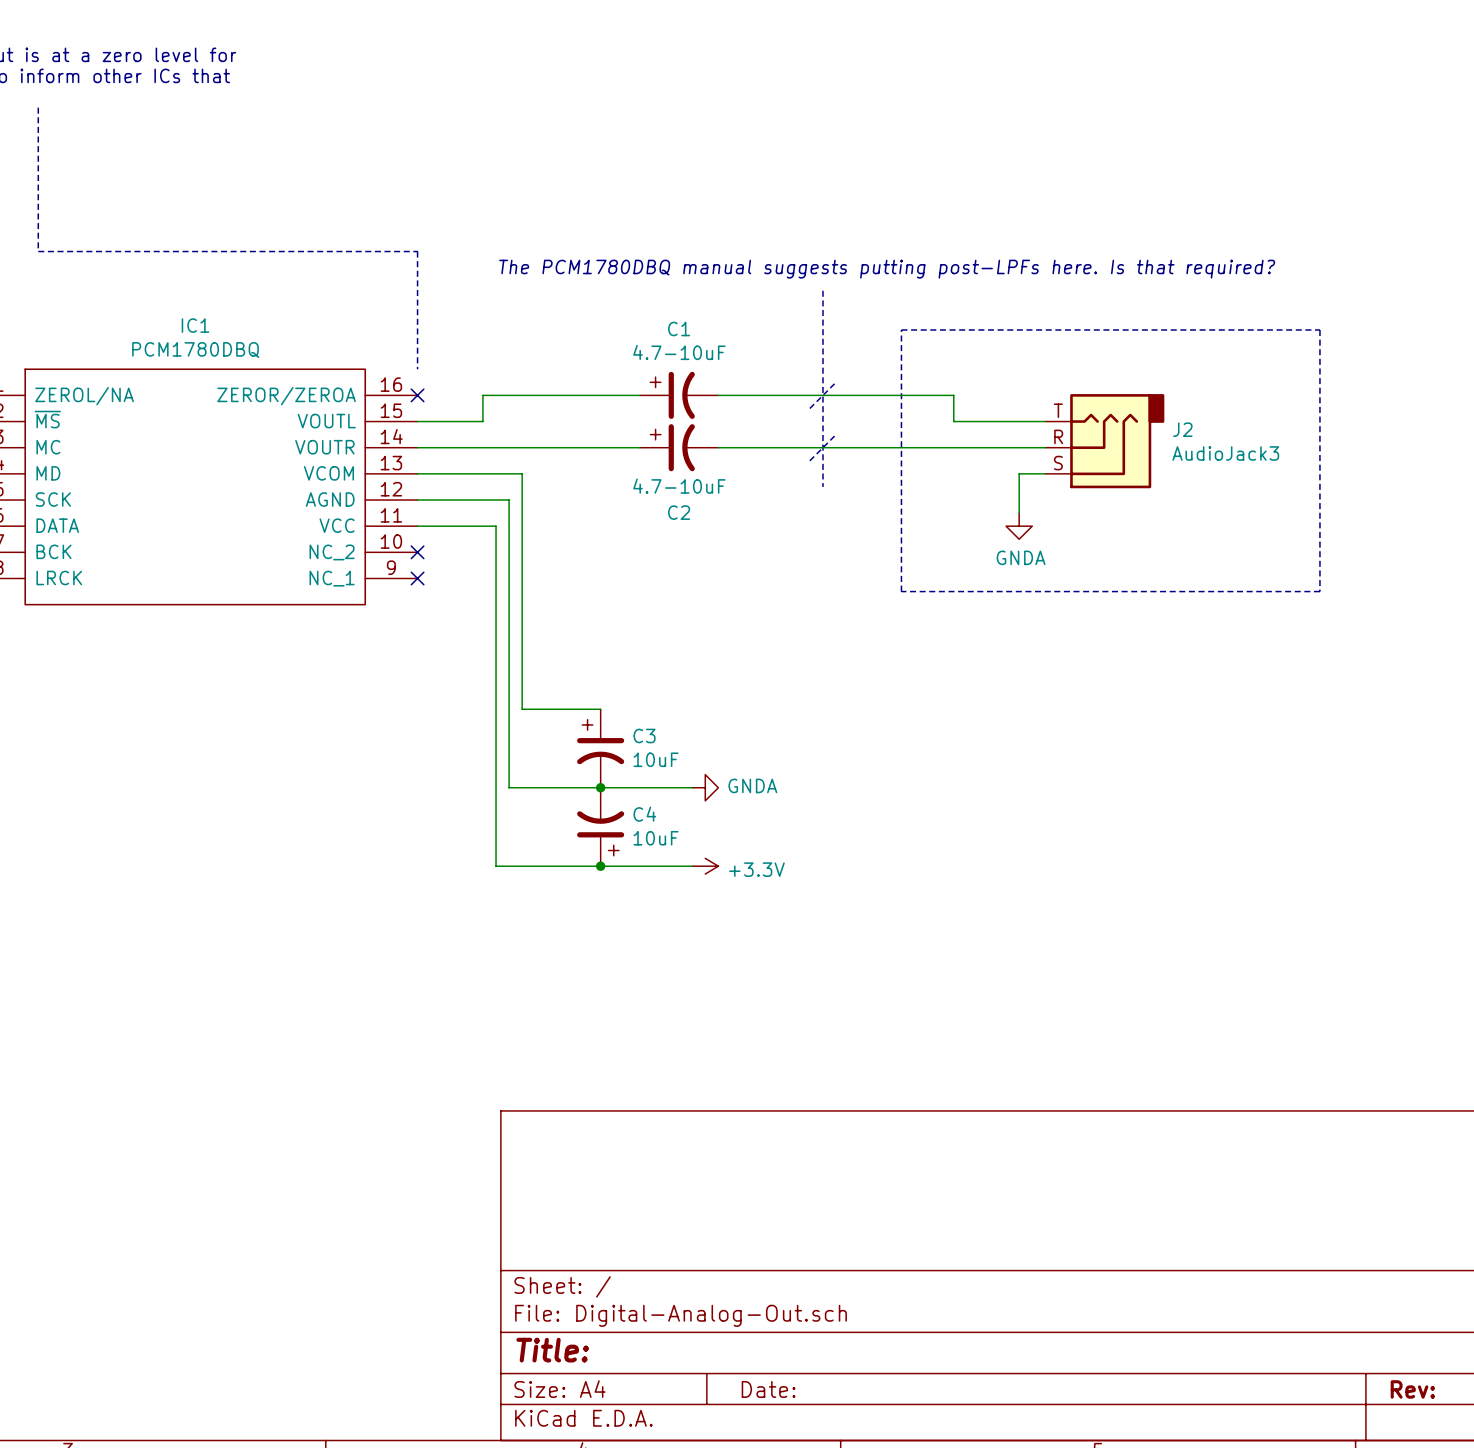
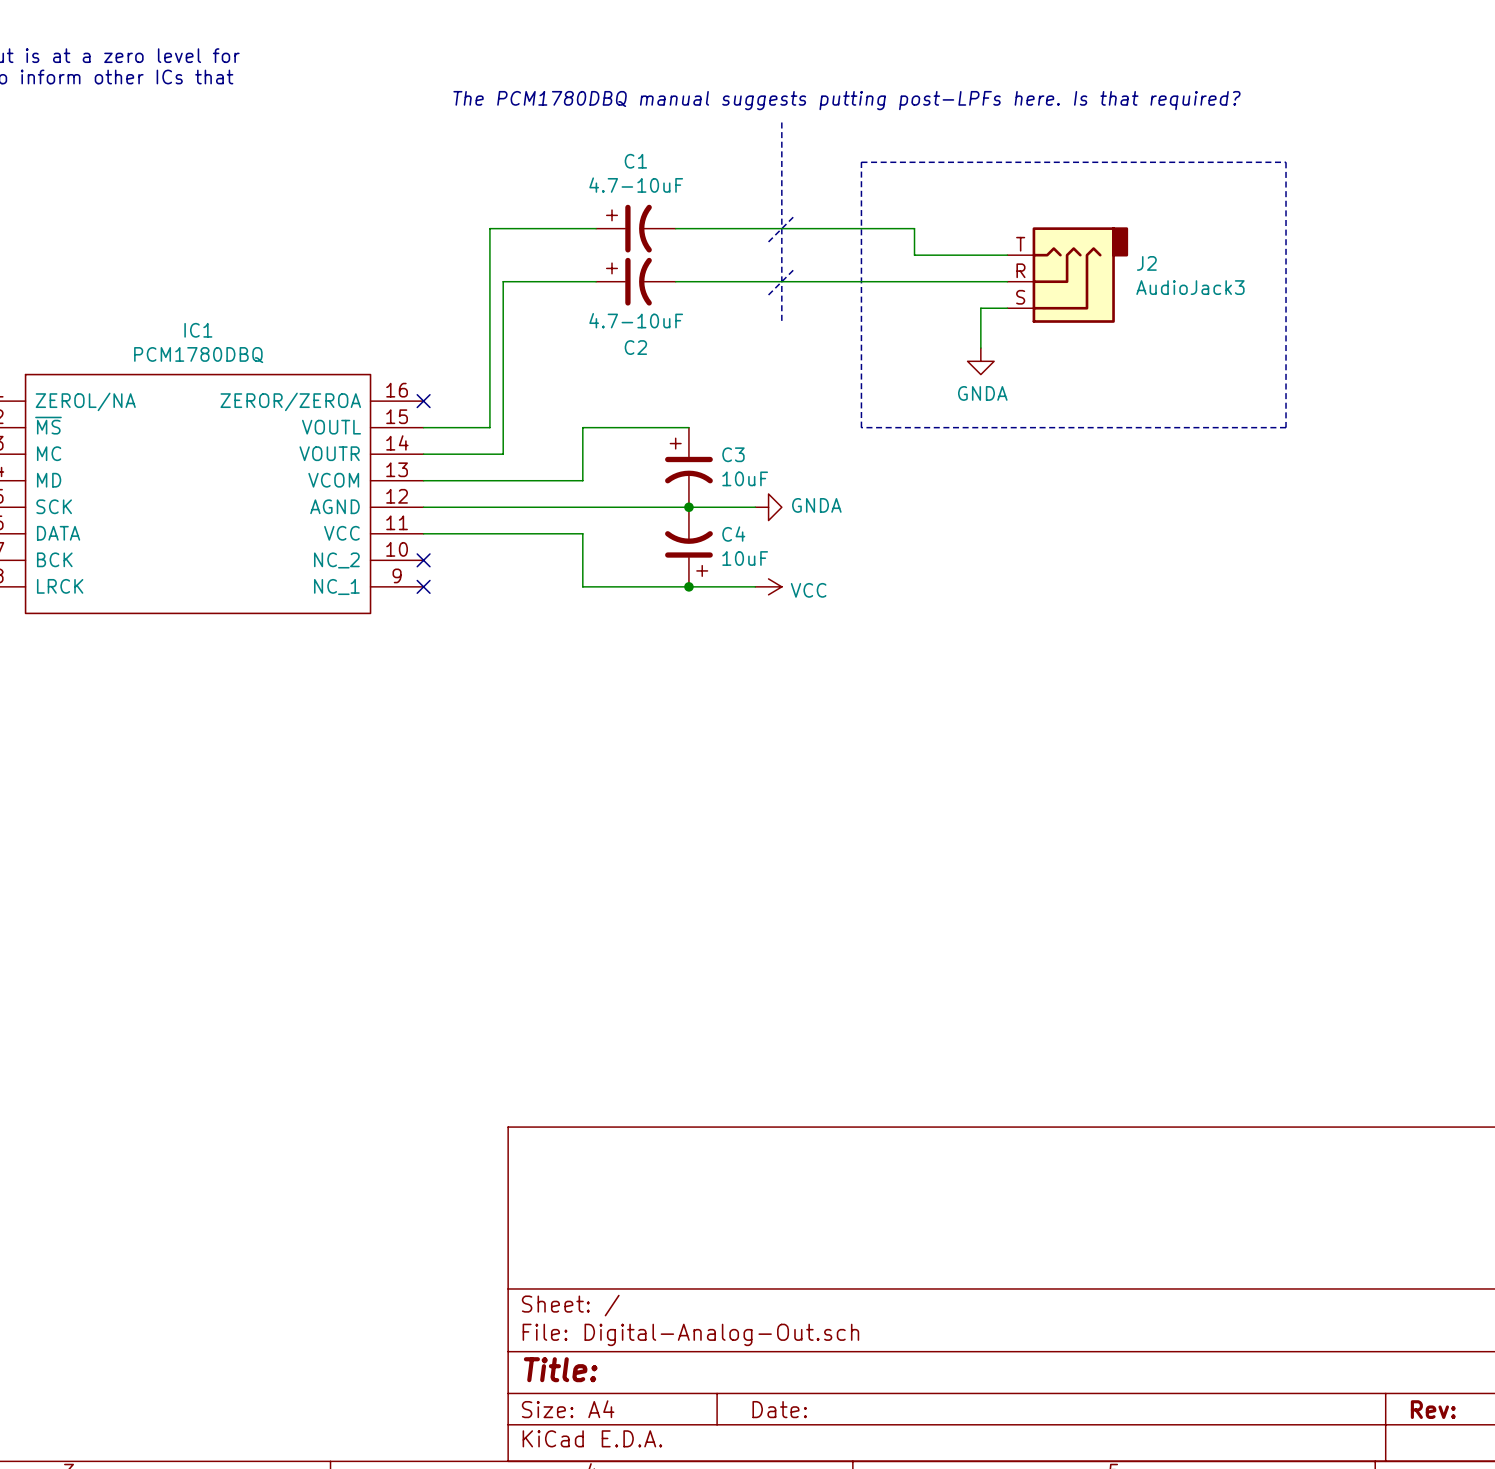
line: (38, 107) (38, 251) (417, 251) (417, 369) -> none
text position: The PCM1780DBQ manual suggests putting post-LPFs here. Is that required? (887, 269) -> The PCM1780DBQ manual suggests putting post-LPFs here. Is that required? (846, 100)
line: (822, 290) (822, 486) -> (781, 122) (781, 321)
line: (901, 329) (1319, 329) (1319, 591) (901, 591) (901, 329) -> (861, 162) (1286, 162) (1286, 427) (861, 427) (861, 162)
power symbol: none -> GNDA (980, 361)
line: (836, 382) (809, 408) -> (795, 215) (768, 241)
wire: (482, 395) (639, 395) -> (489, 401) (489, 228) (596, 228)
C1 position: (679, 395) -> (635, 228)
wire: (718, 395) (953, 395) (953, 421) (1045, 421) -> (675, 228) (914, 228) (914, 255) (1007, 255)
line: (836, 434) (809, 460) -> (795, 268) (768, 294)
J2 position: (1104, 441) -> (1067, 275)
wire: (496, 447) (639, 447) -> (503, 454) (503, 281) (596, 281)
C2 position: (679, 447) -> (635, 281)
wire: (718, 447) (1045, 447) -> (675, 281) (1007, 281)
wire: (522, 473) (522, 709) (600, 709) -> (529, 480) (582, 480) (582, 427) (688, 427)
wire: (1045, 473) (1019, 473) (1019, 513) -> (1007, 308) (980, 308) (980, 348)
wire: (509, 500) (509, 787) (692, 787) -> (516, 507) (755, 507)
junction: none -> (688, 507)
power symbol: none -> GNDA (768, 507)
wire: (496, 526) (496, 866) (692, 866) -> (503, 533) (582, 533) (582, 586) (755, 586)
power symbol: GNDA (1019, 526) -> none
junction: none -> (688, 586)
power symbol: none -> VCC (768, 586)
C3 position: (600, 748) -> (688, 467)
junction: (600, 787) -> none
power symbol: GNDA (705, 787) -> none
C4 position: (600, 826) -> (688, 547)
junction: (600, 866) -> none
power symbol: +3.3V (705, 866) -> none

